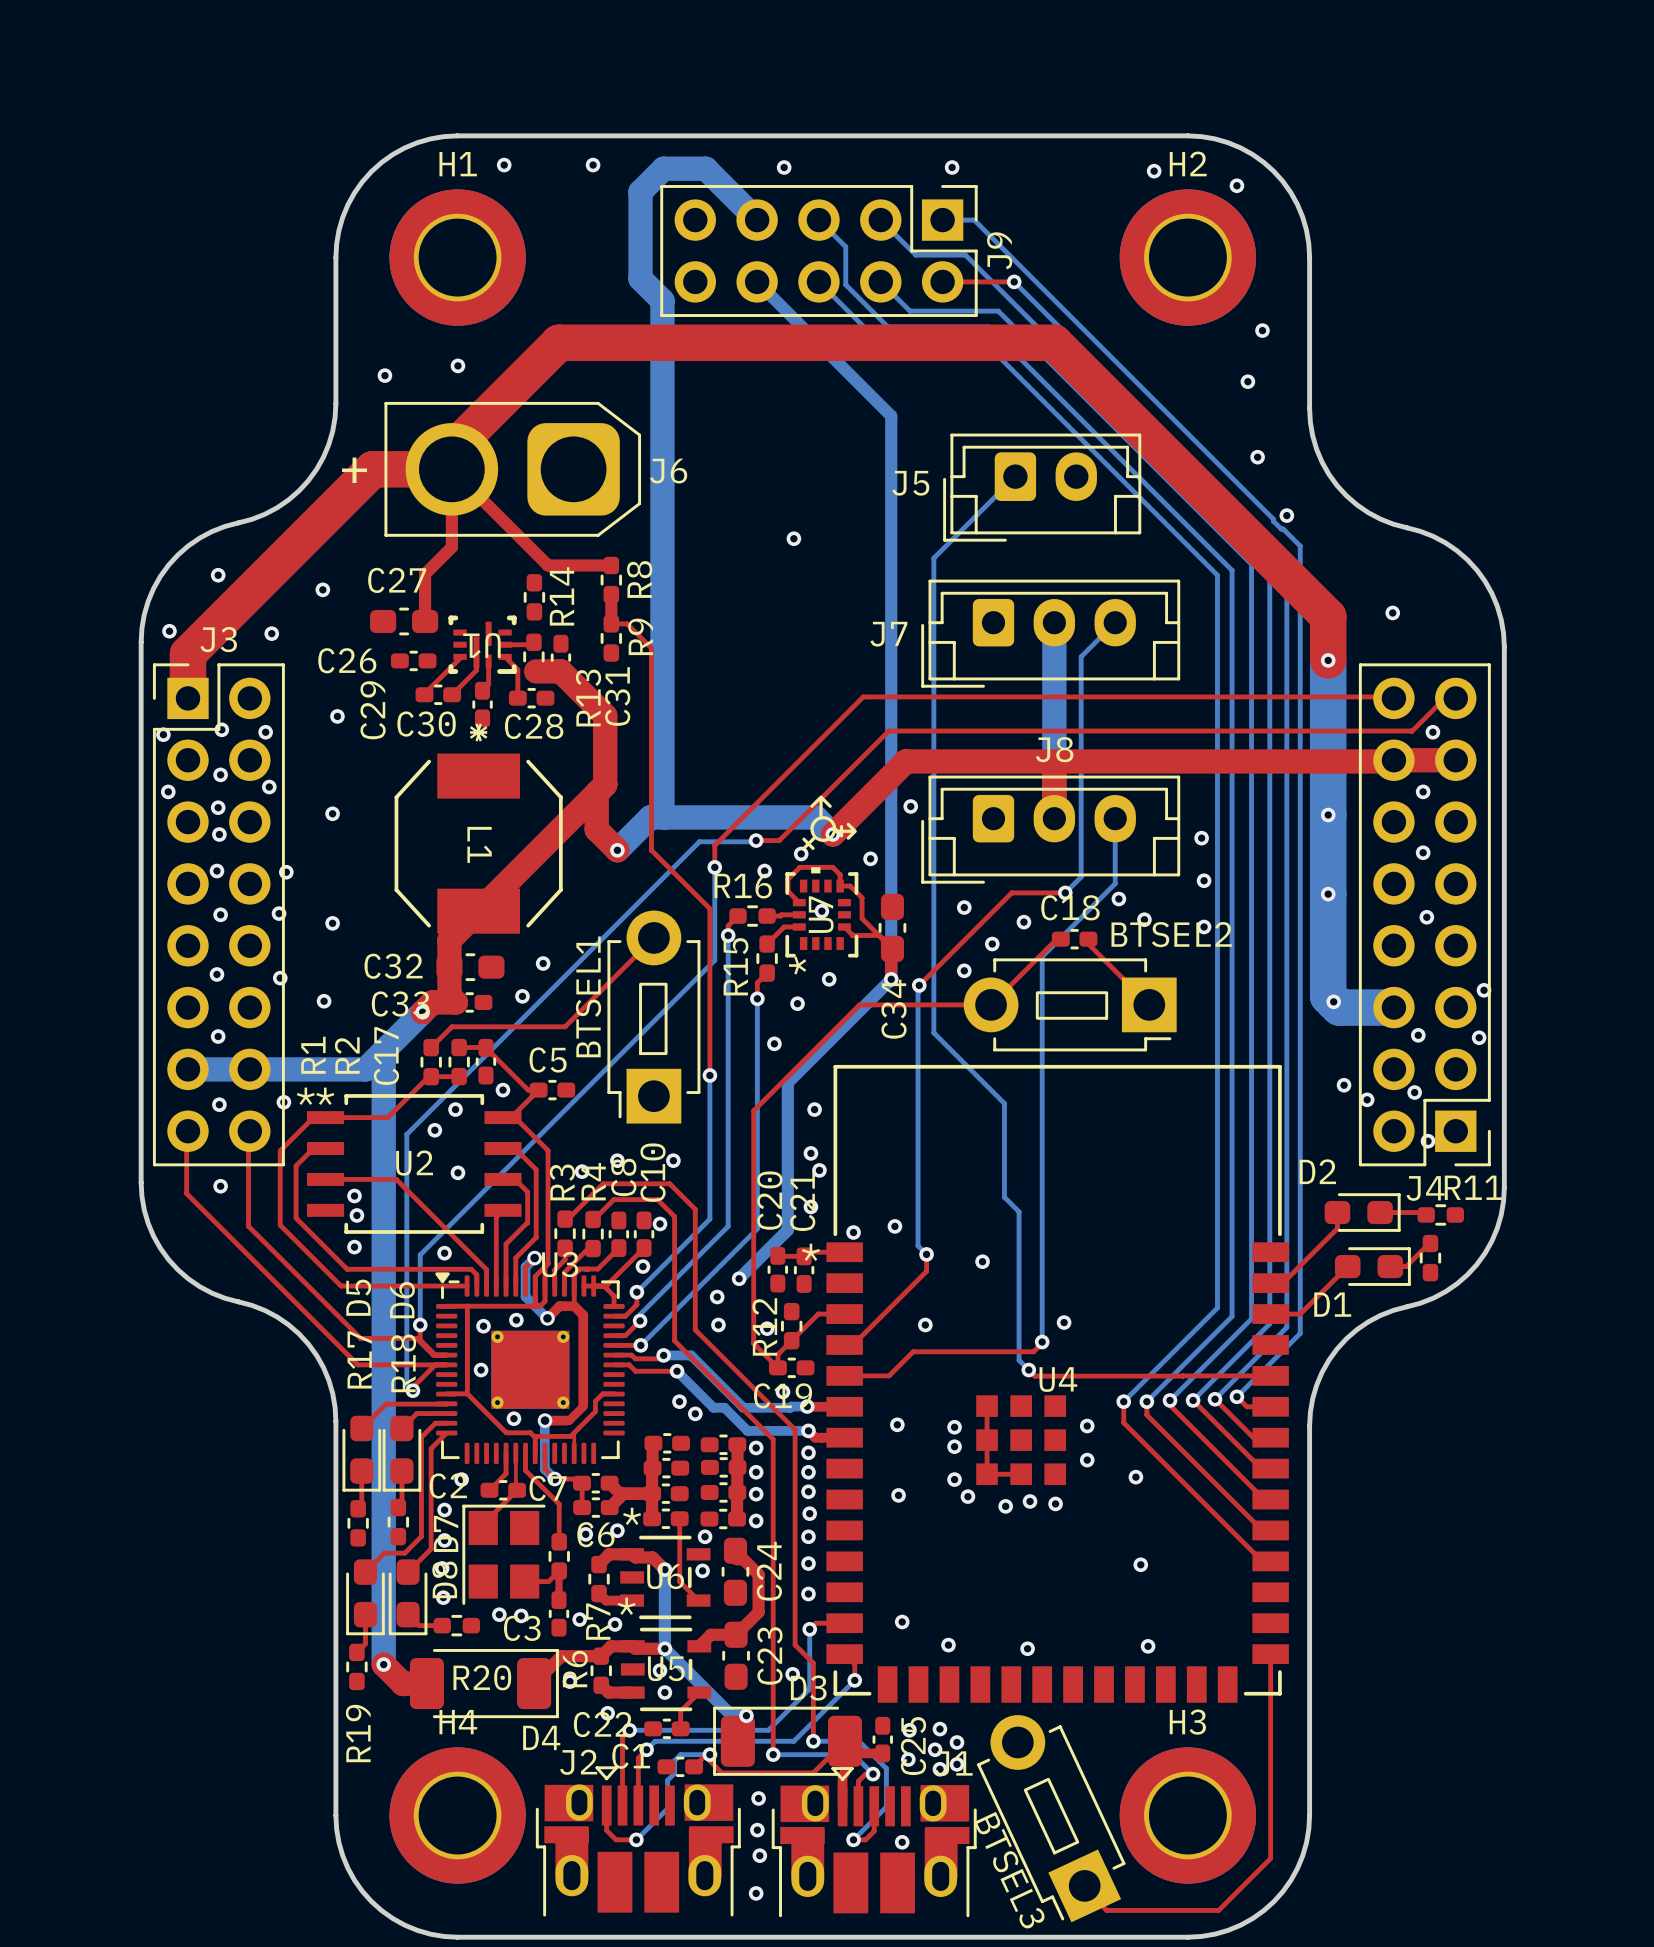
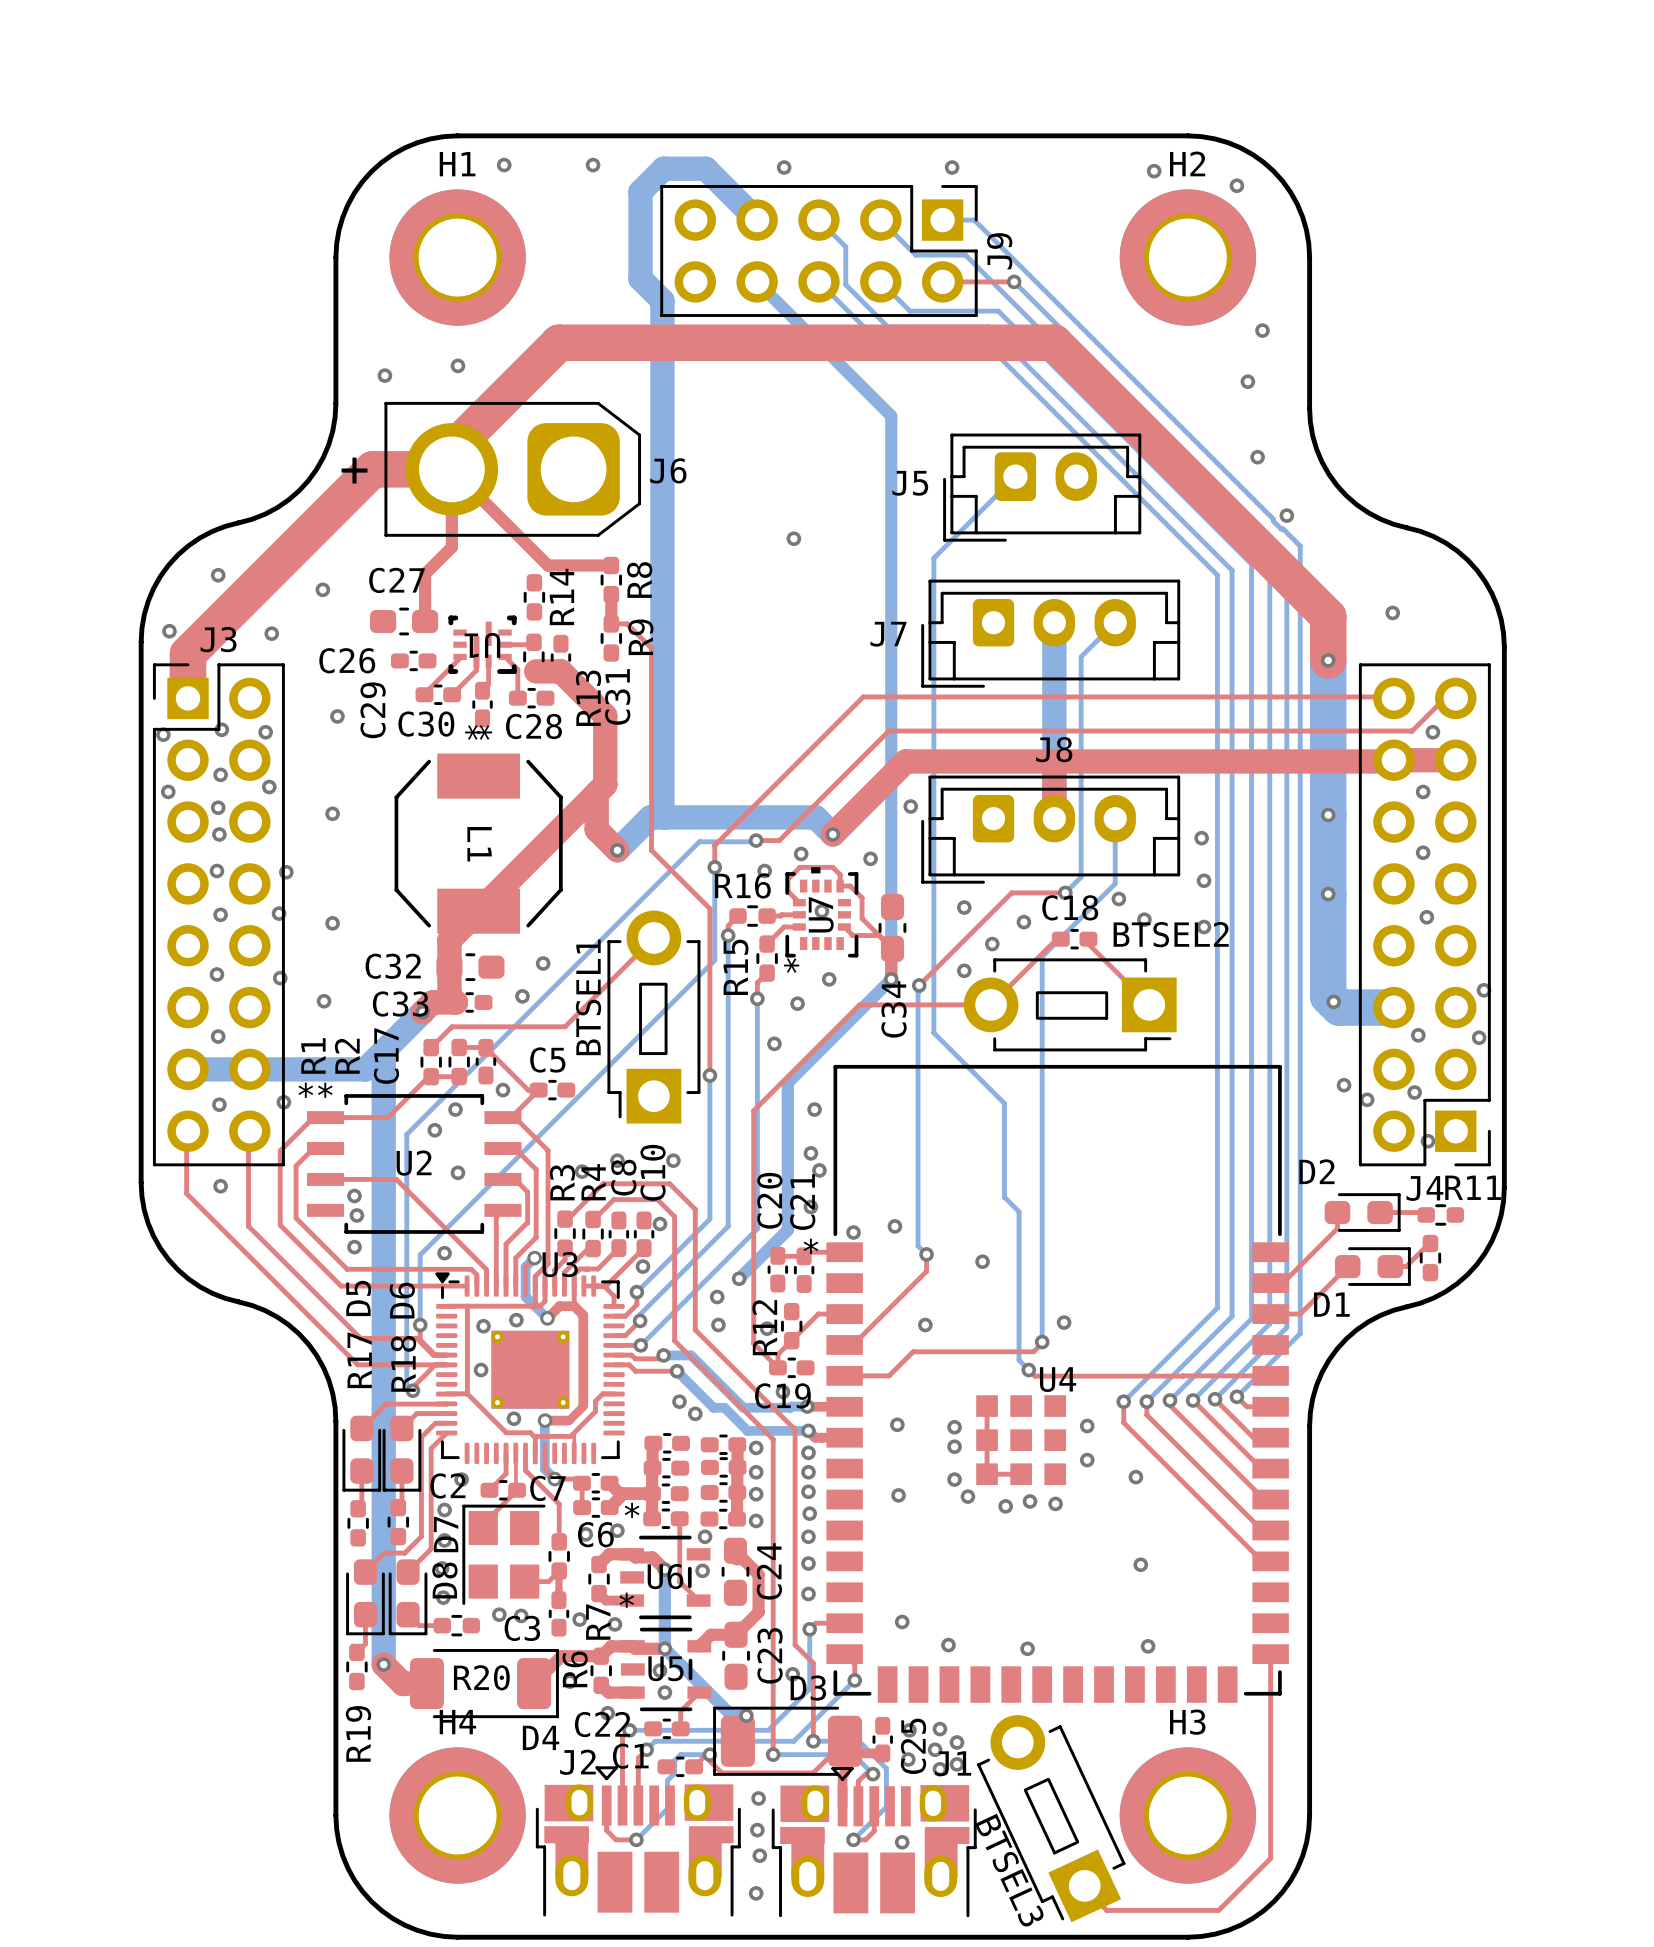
drawing: [802, 795, 857, 850] -> none

